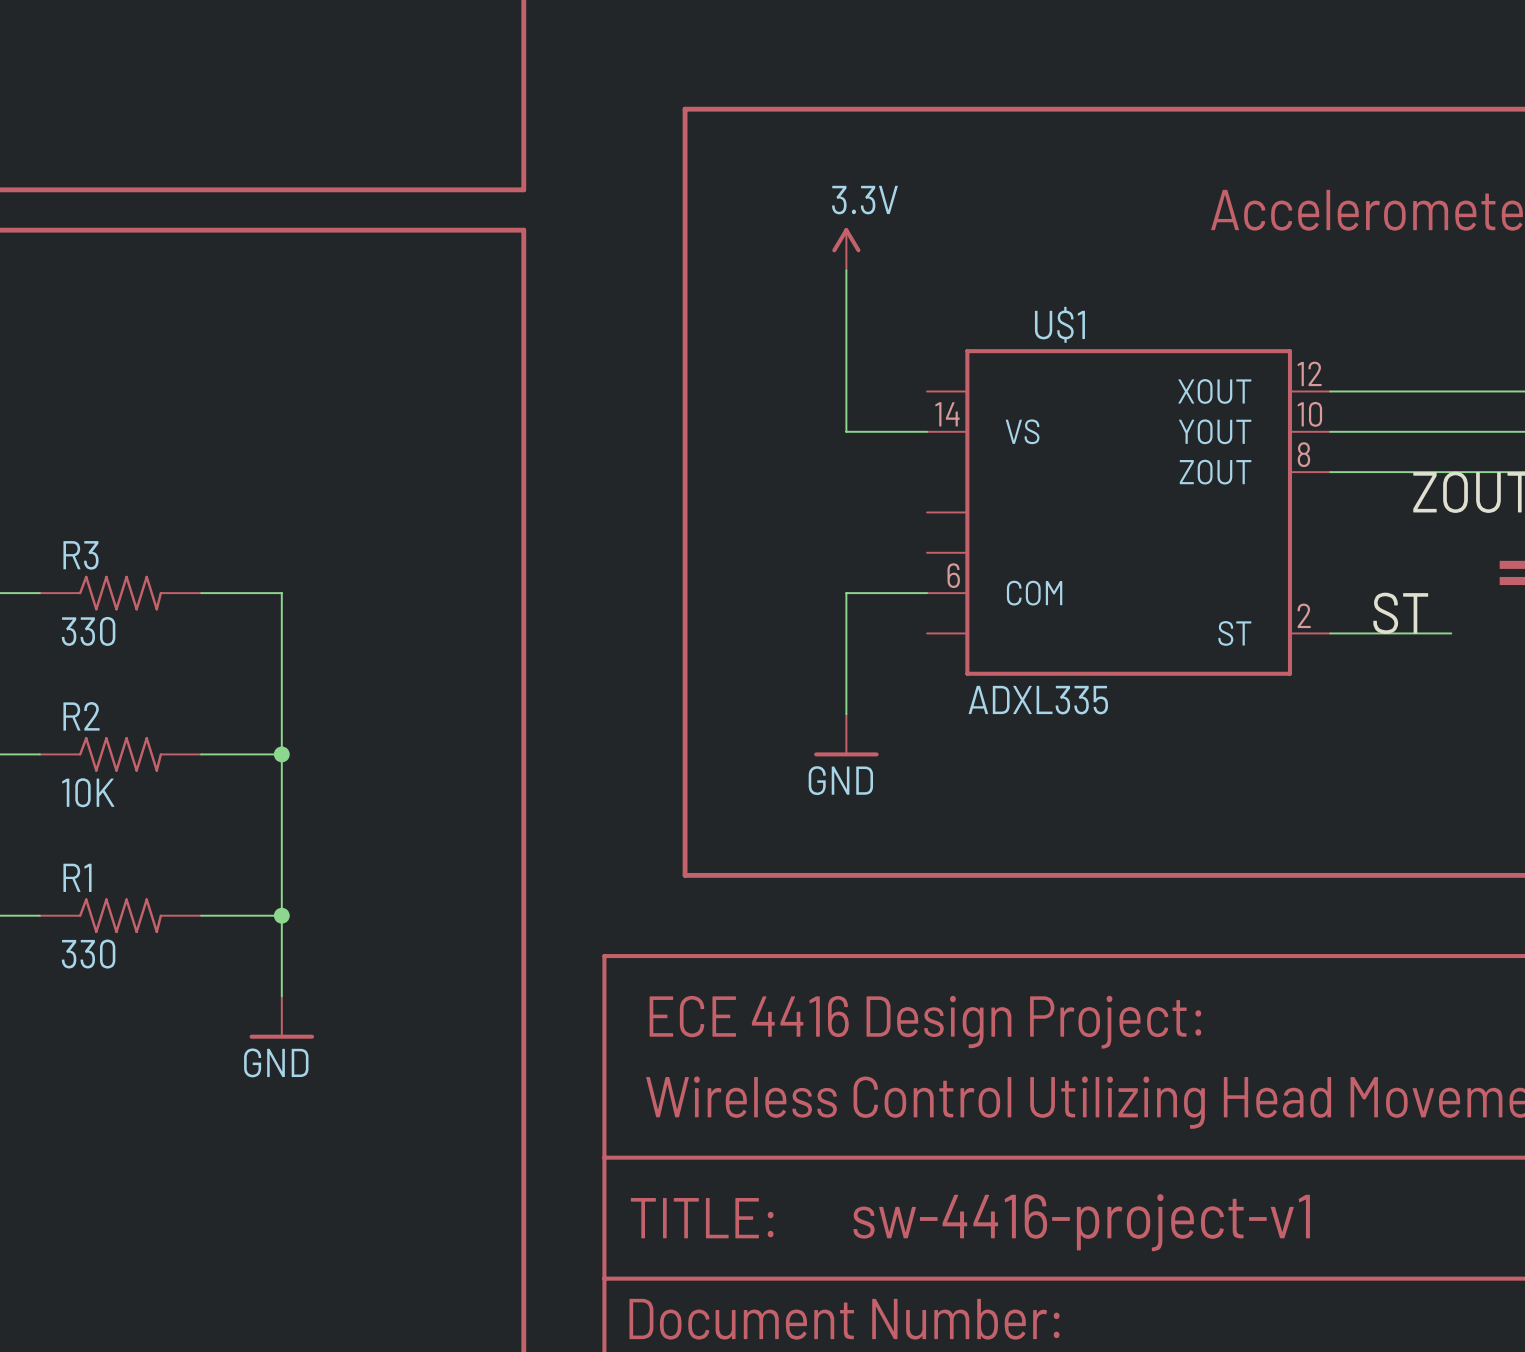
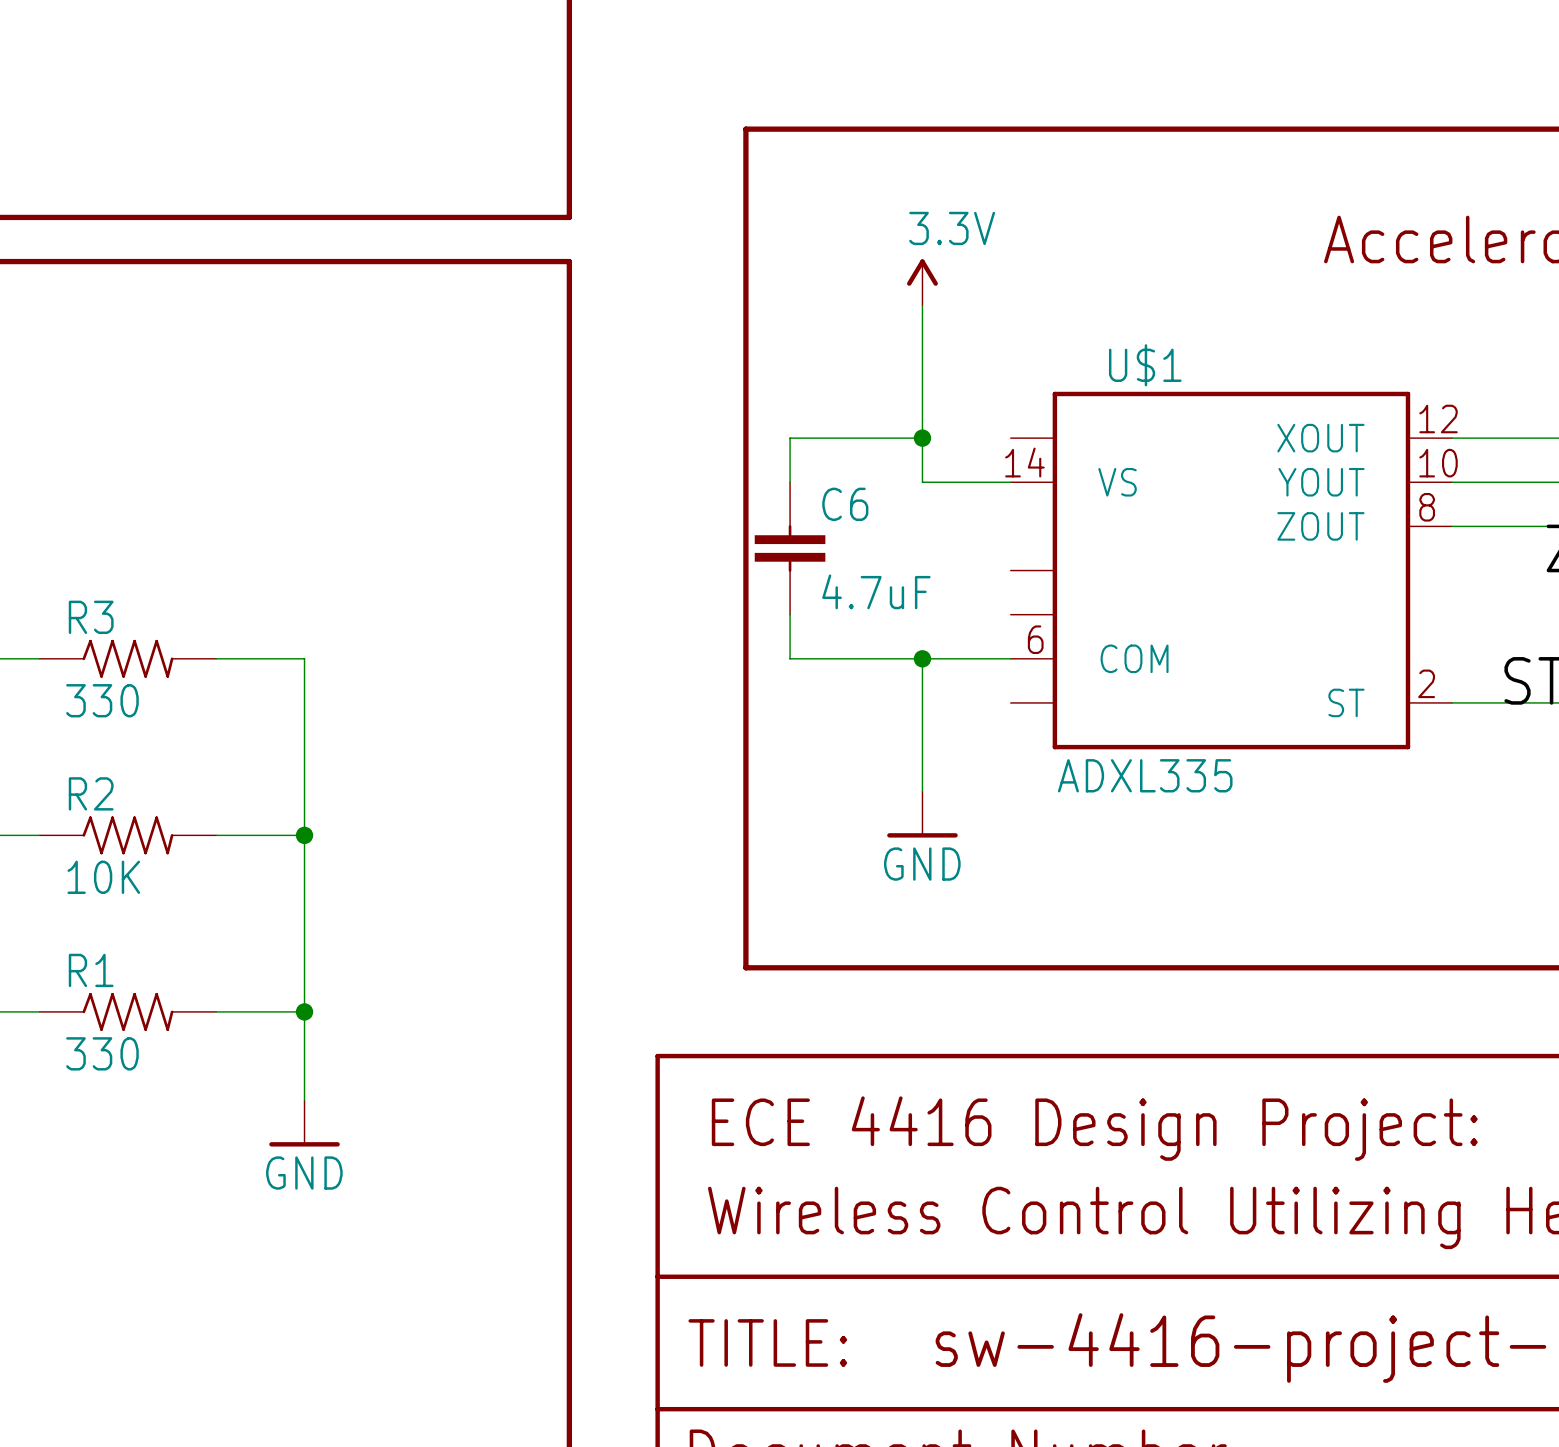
wire: none -> (922, 438) (790, 438) (790, 482)
junction: none -> (922, 438)
C6: none -> 4.7uF (790, 548)
wire: none -> (790, 614) (790, 658) (922, 658)
junction: none -> (922, 658)

